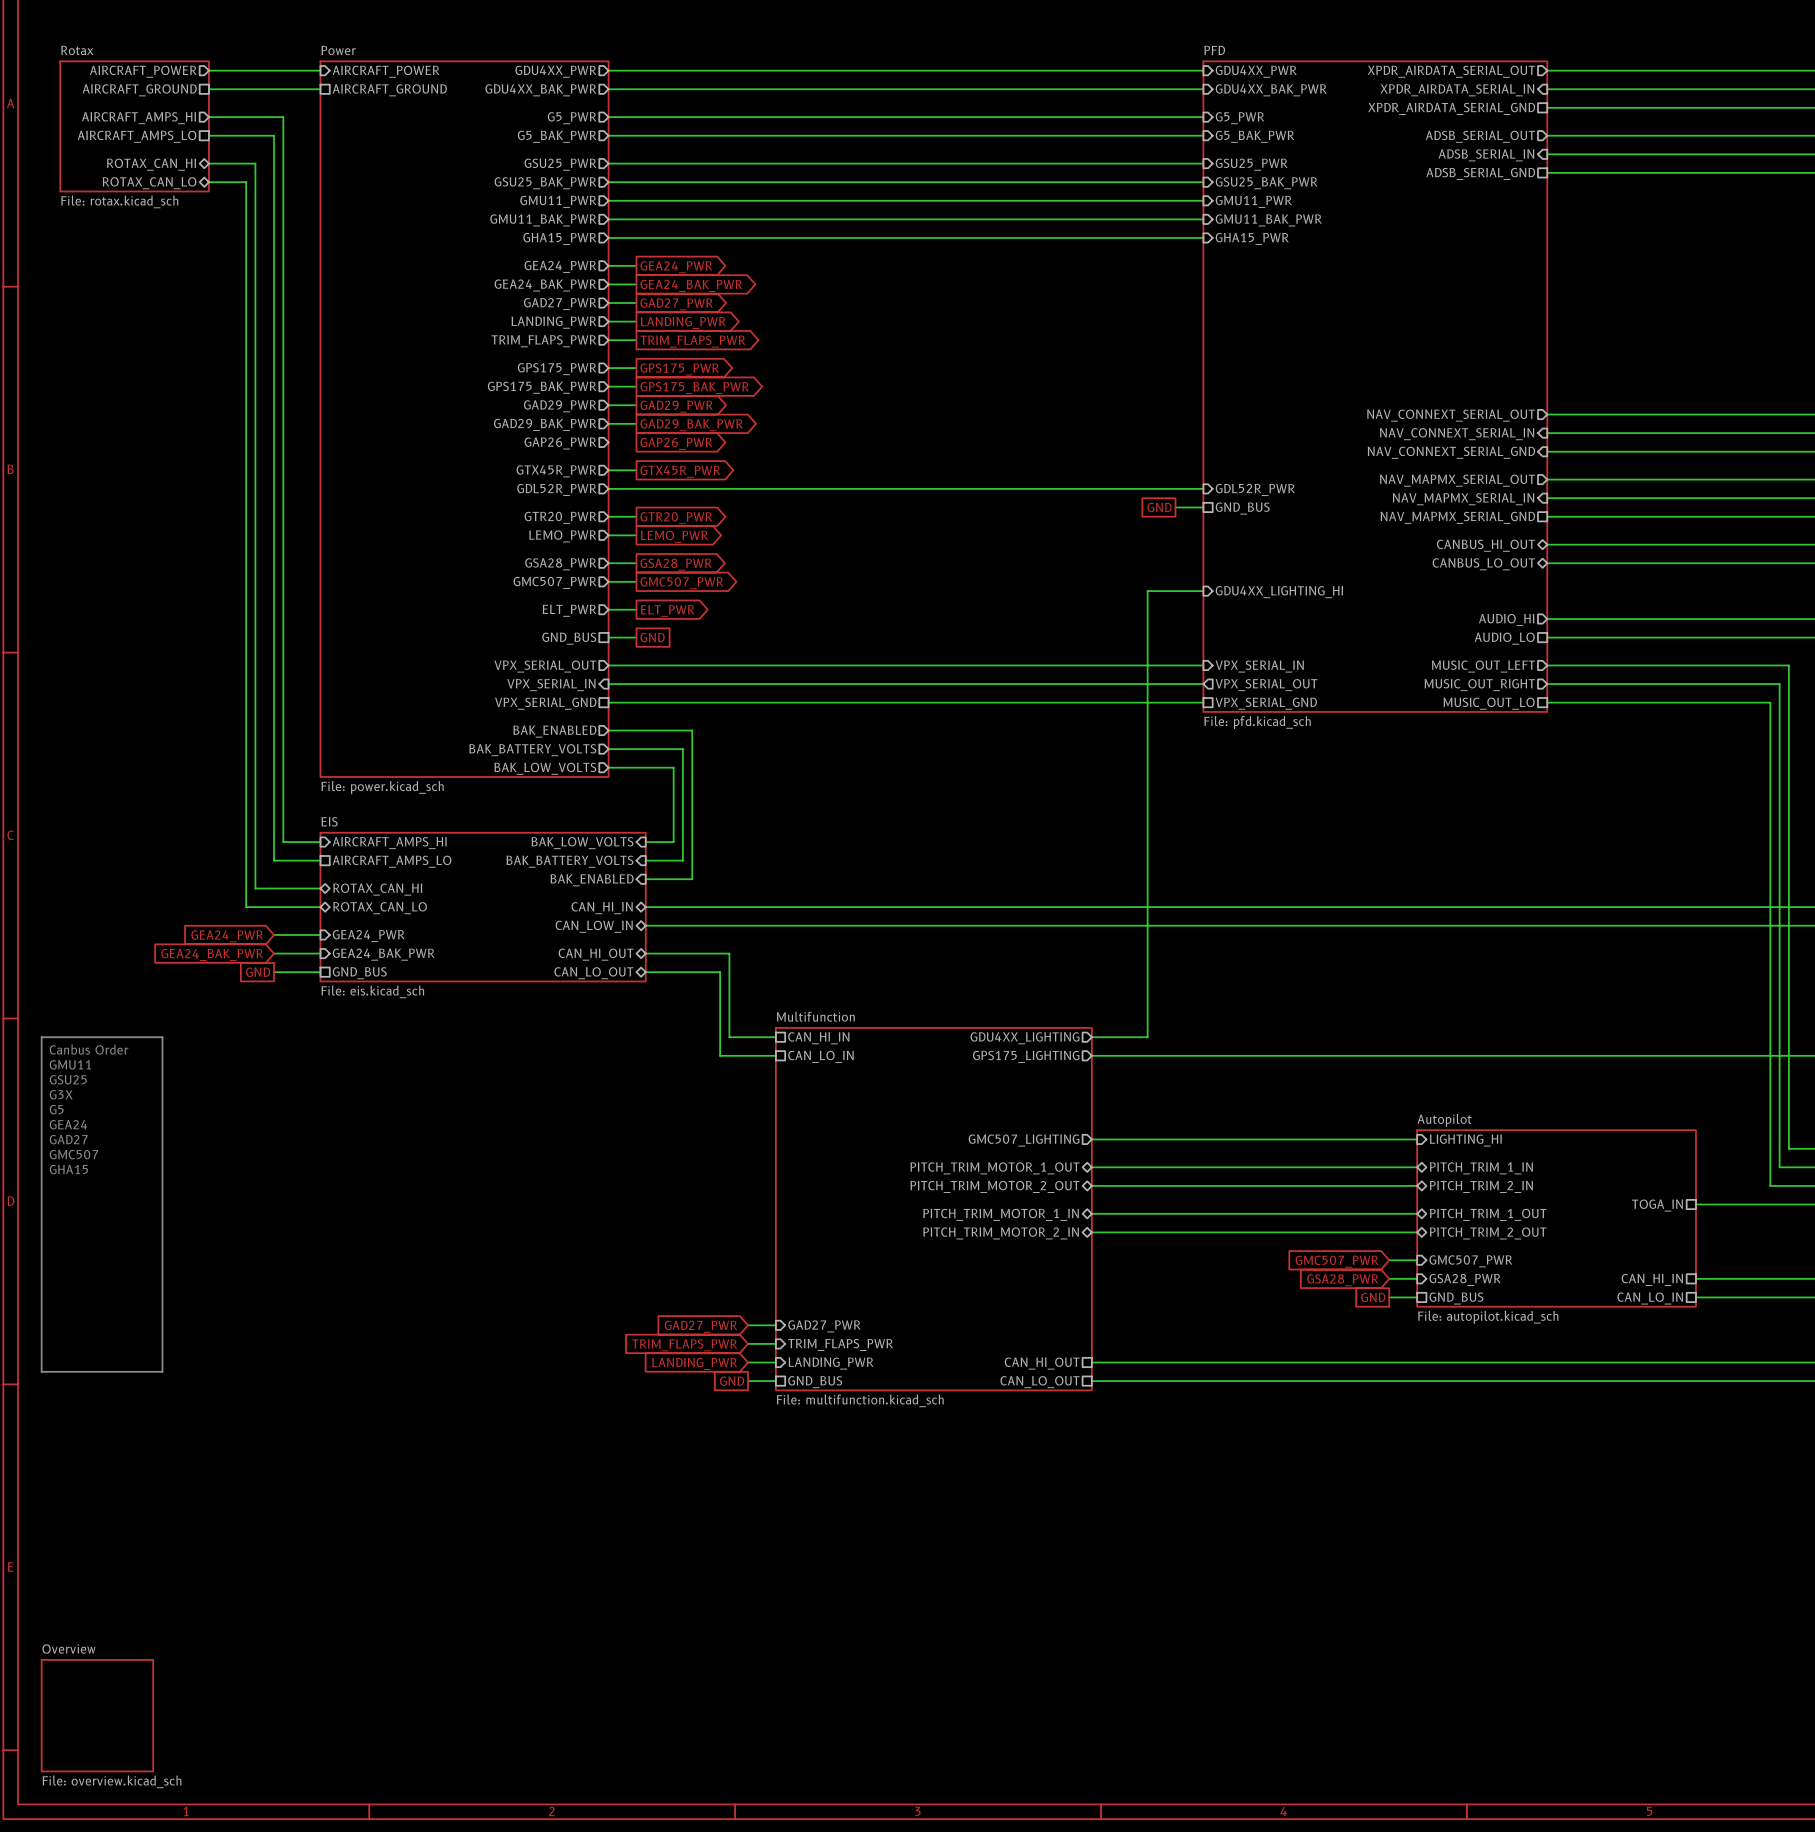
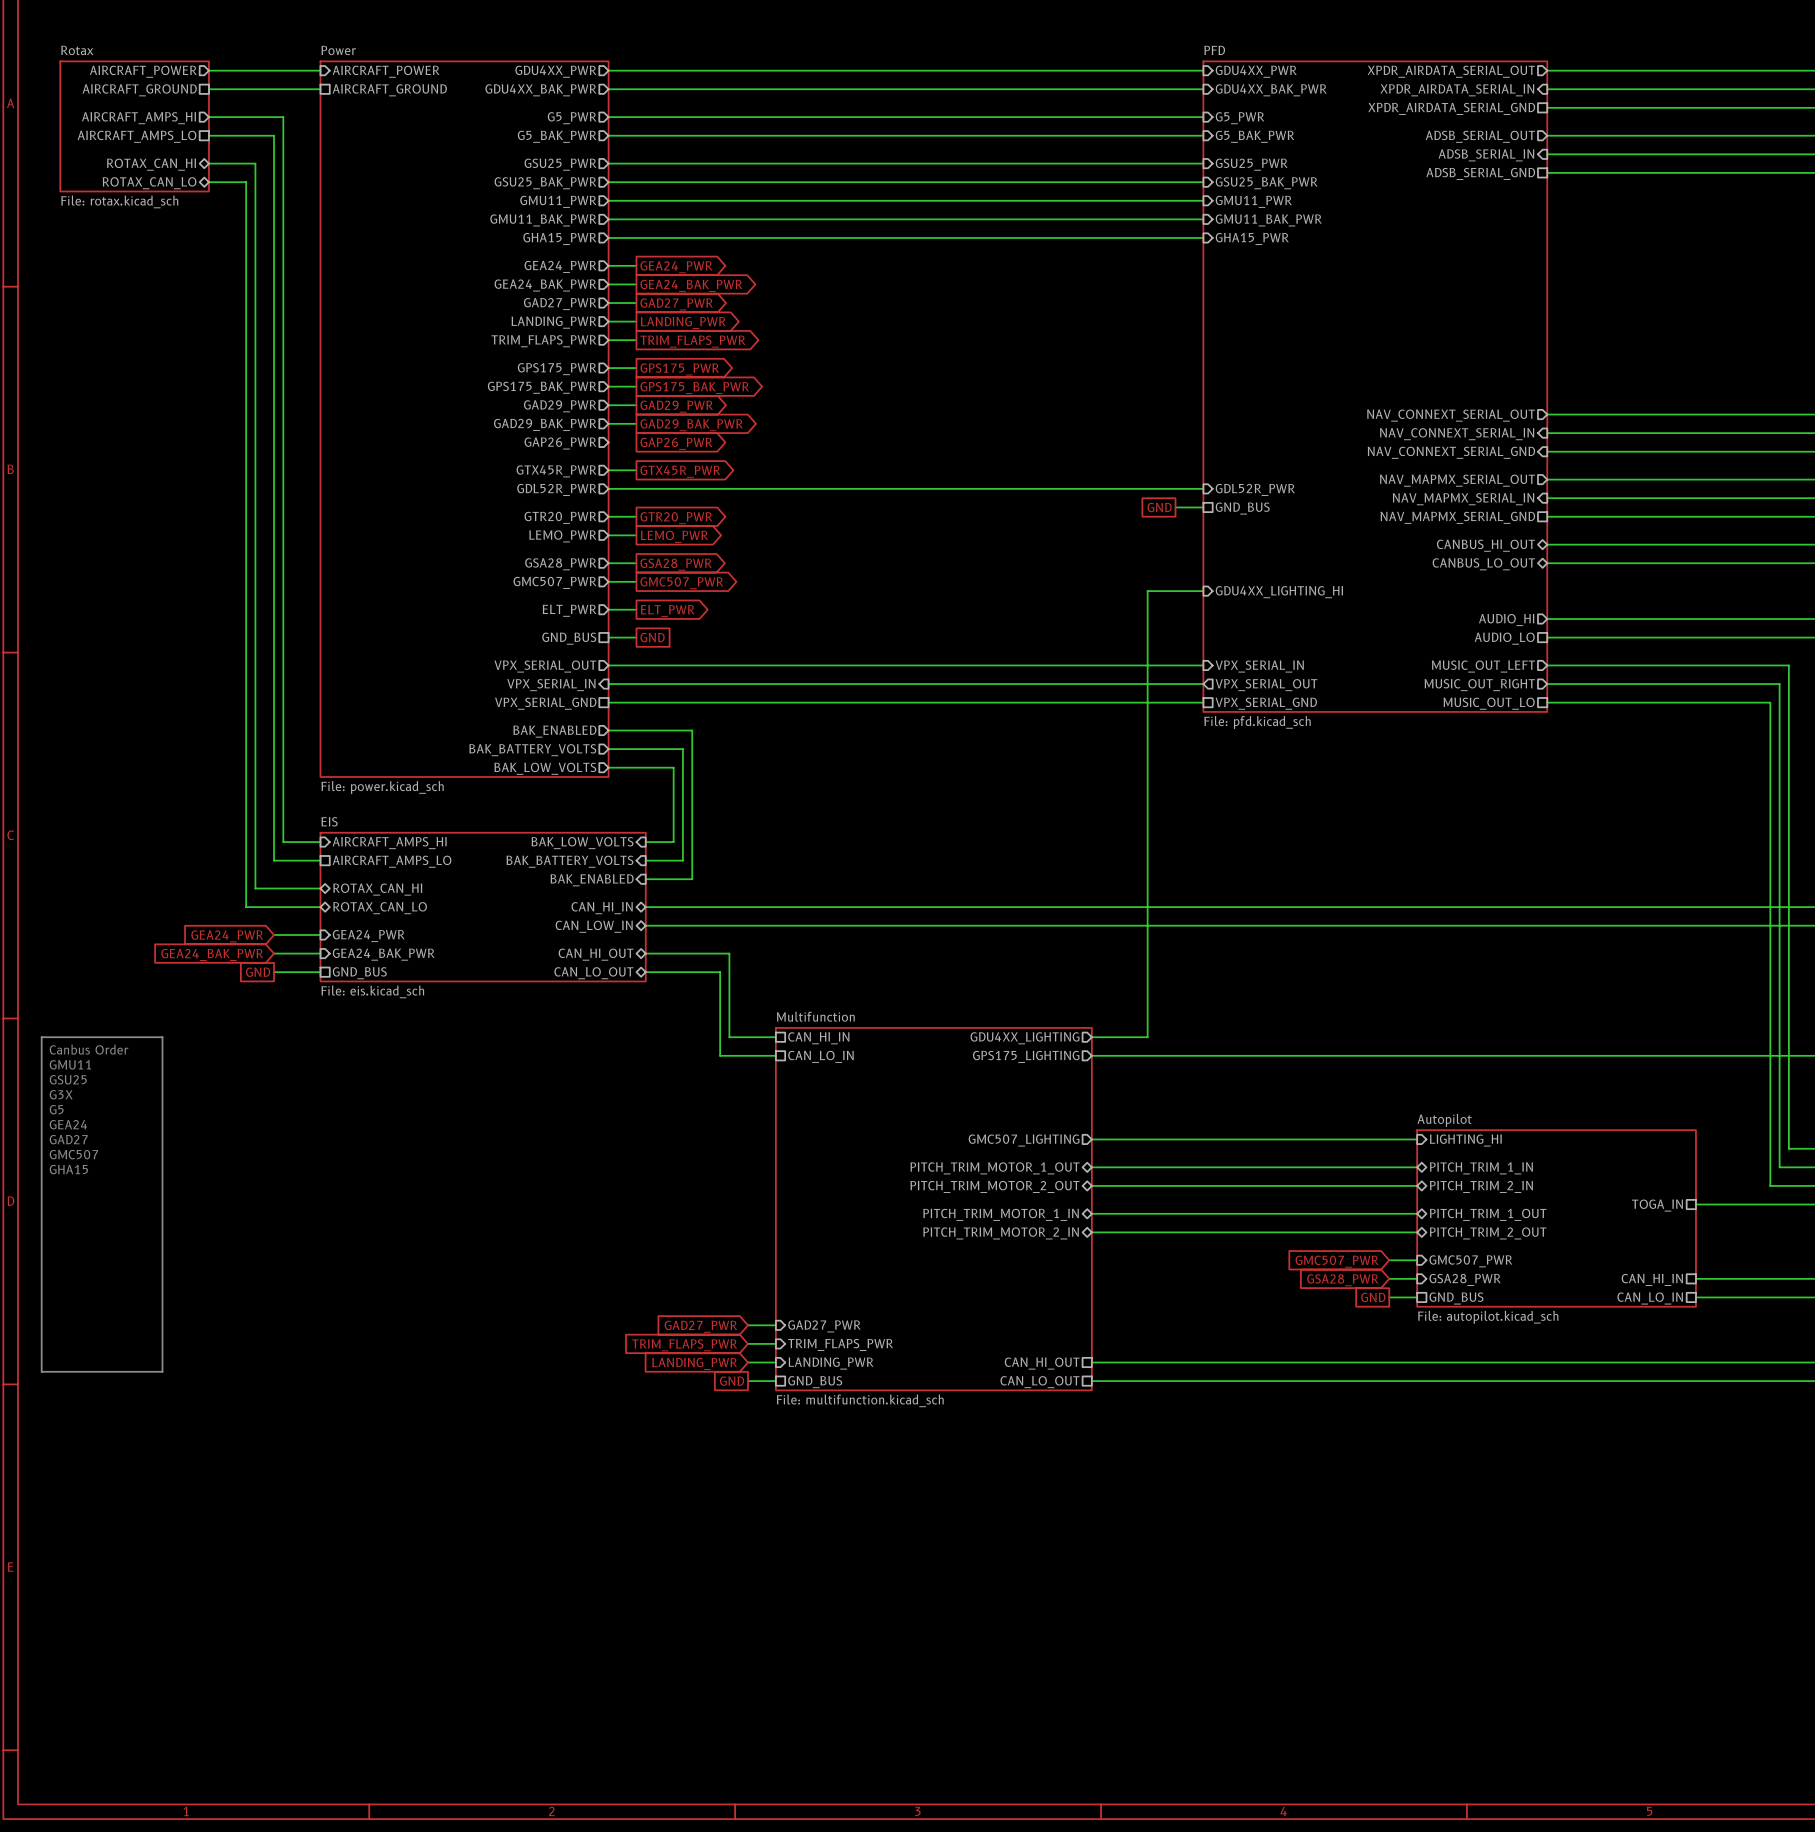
sheet Overview: File: overview.kicad_sch (97, 1715) -> none

